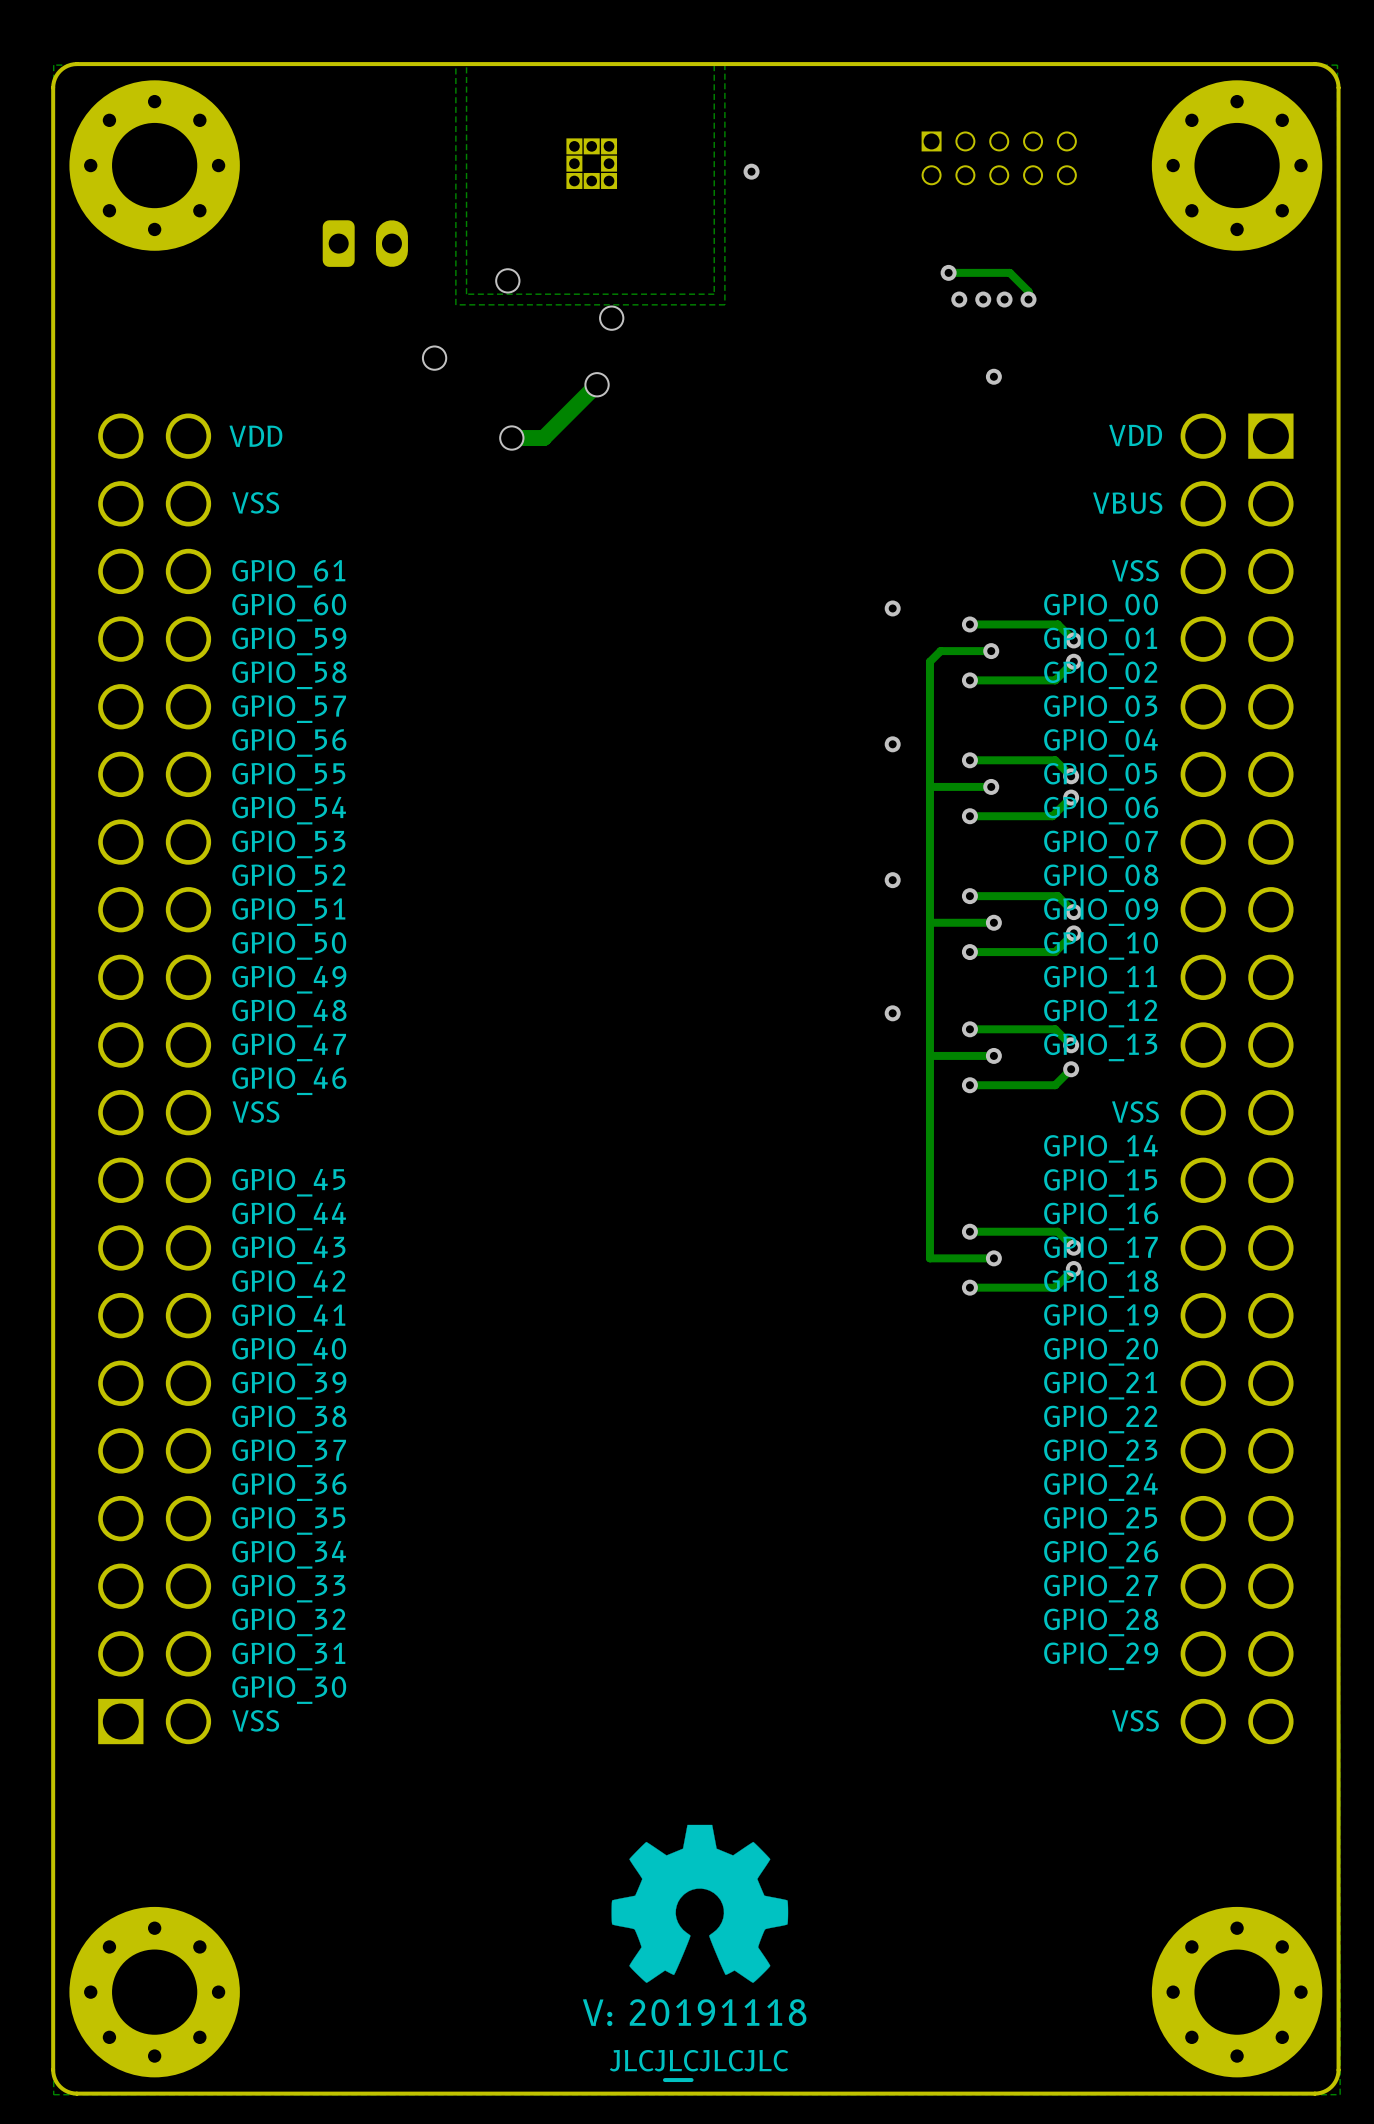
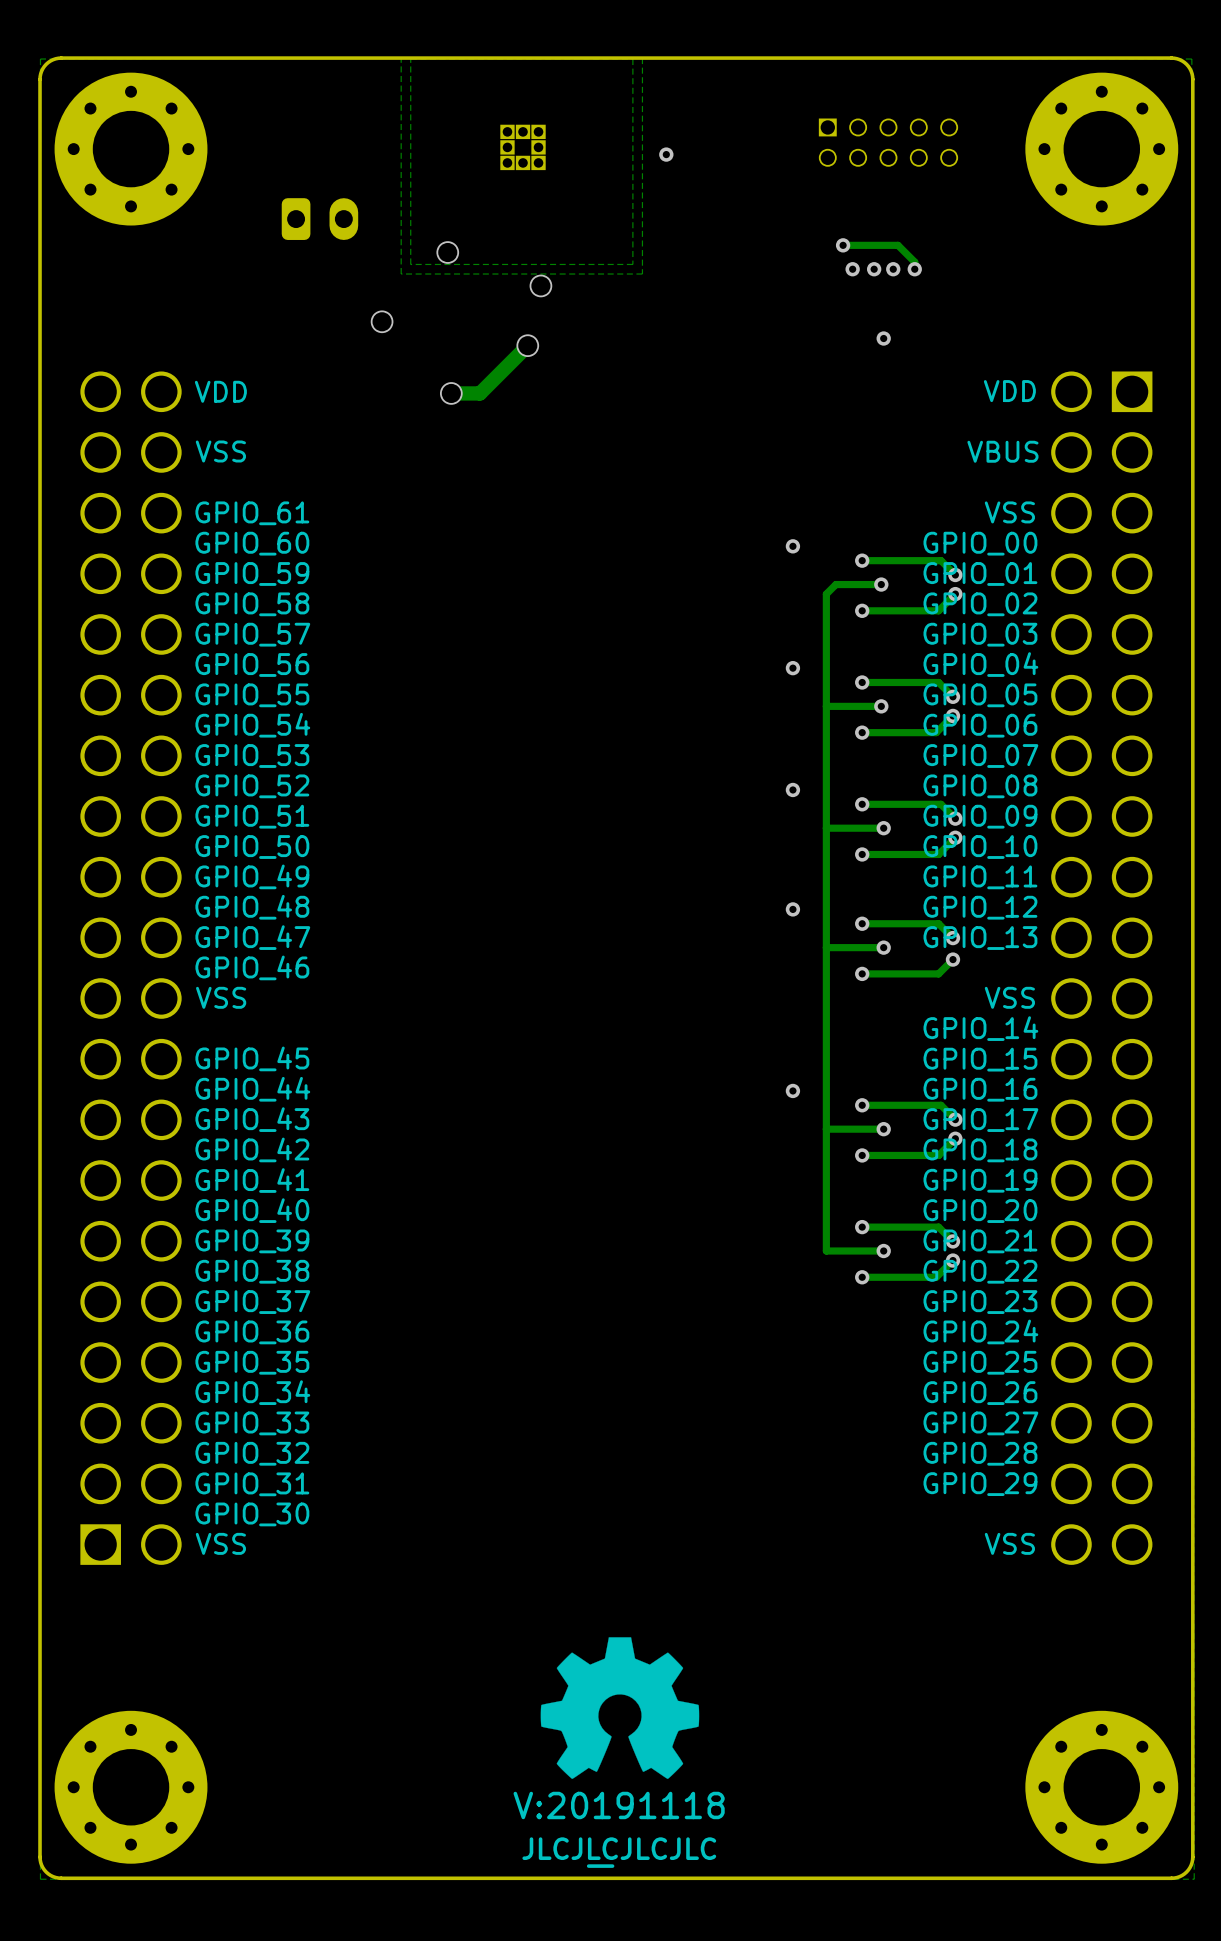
via: none -> (792, 1090)
track: none -> (826, 1129) (826, 1251) (883, 1251)
track: none -> (862, 1227) (938, 1227) (952, 1241)
via: none -> (862, 1227)
via: none -> (952, 1241)
via: none -> (883, 1251)
track: none -> (952, 1260) (936, 1277) (862, 1277)
via: none -> (952, 1260)
via: none -> (862, 1277)

